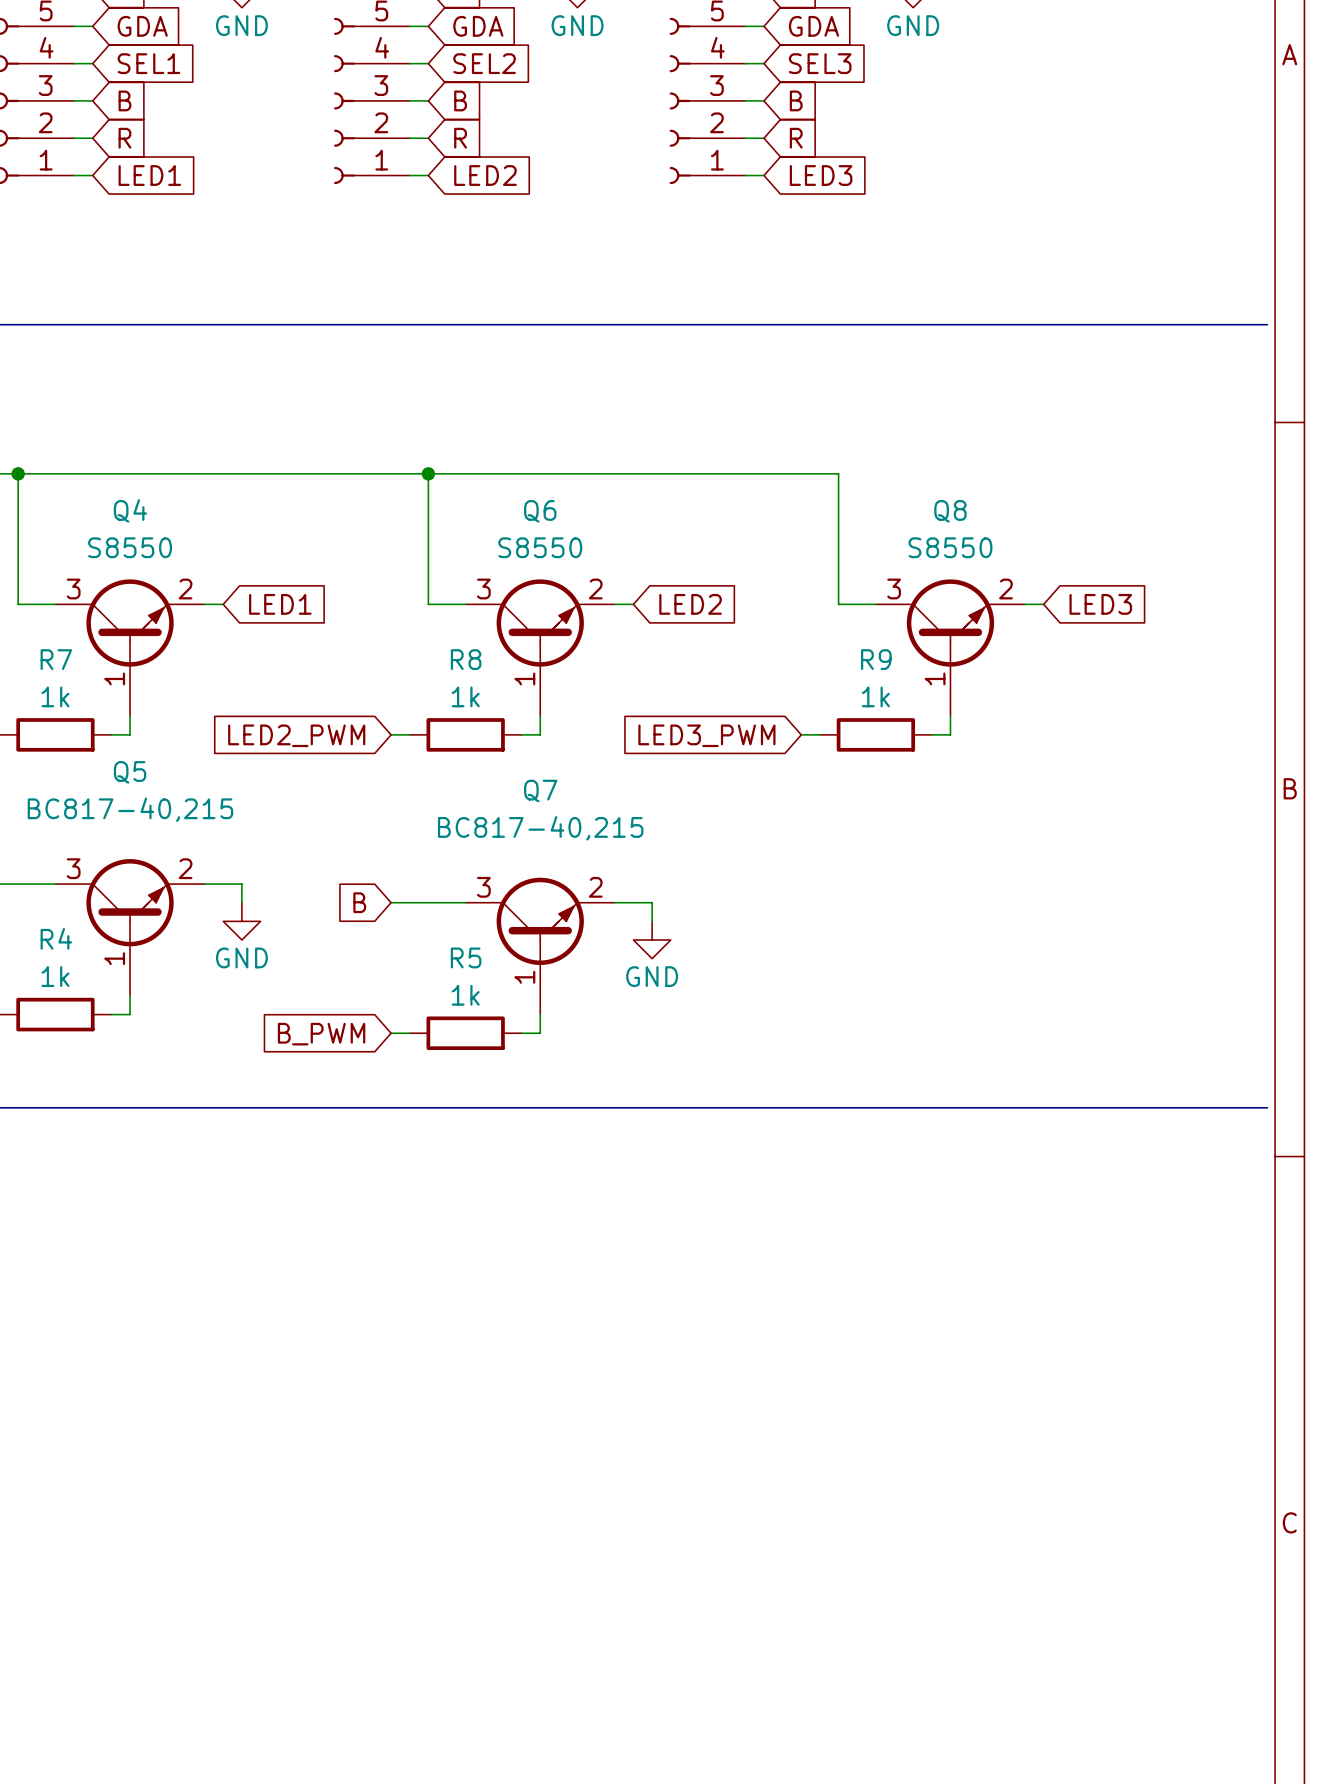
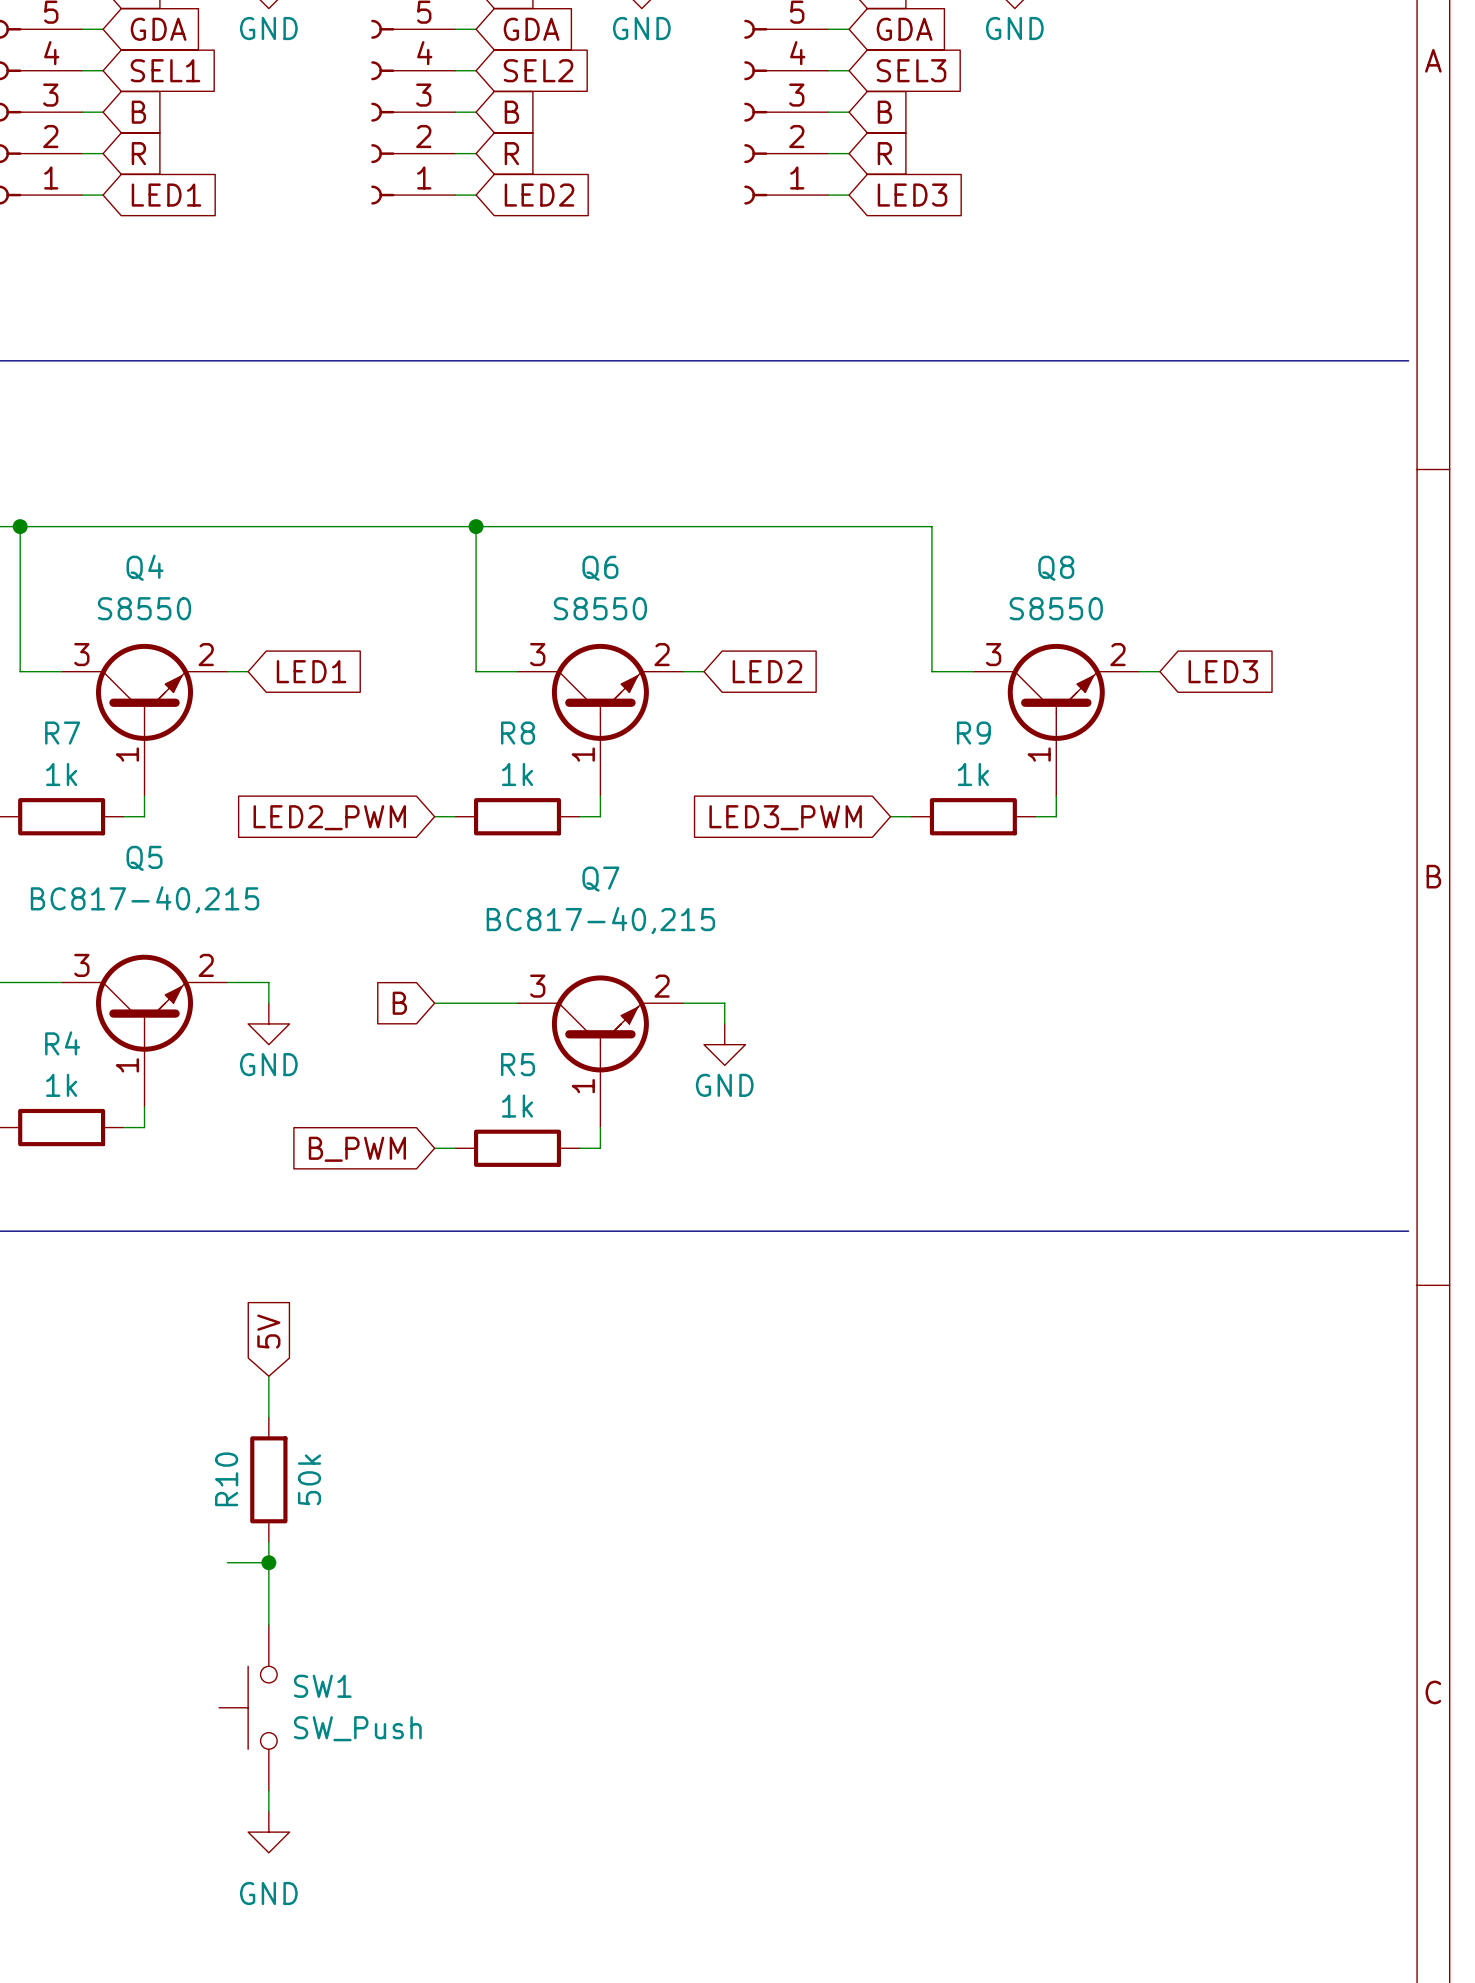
global label: none -> 5V (268, 1331)
wire: none -> (268, 1376) (268, 1417)
R10: none -> 50k (268, 1479)
wire: none -> (268, 1542) (268, 1624)
wire: none -> (227, 1562) (268, 1562)
junction: none -> (268, 1562)
SW1: none -> SW_Push (248, 1707)
wire: none -> (268, 1790) (268, 1811)
power symbol: none -> GND (268, 1832)

